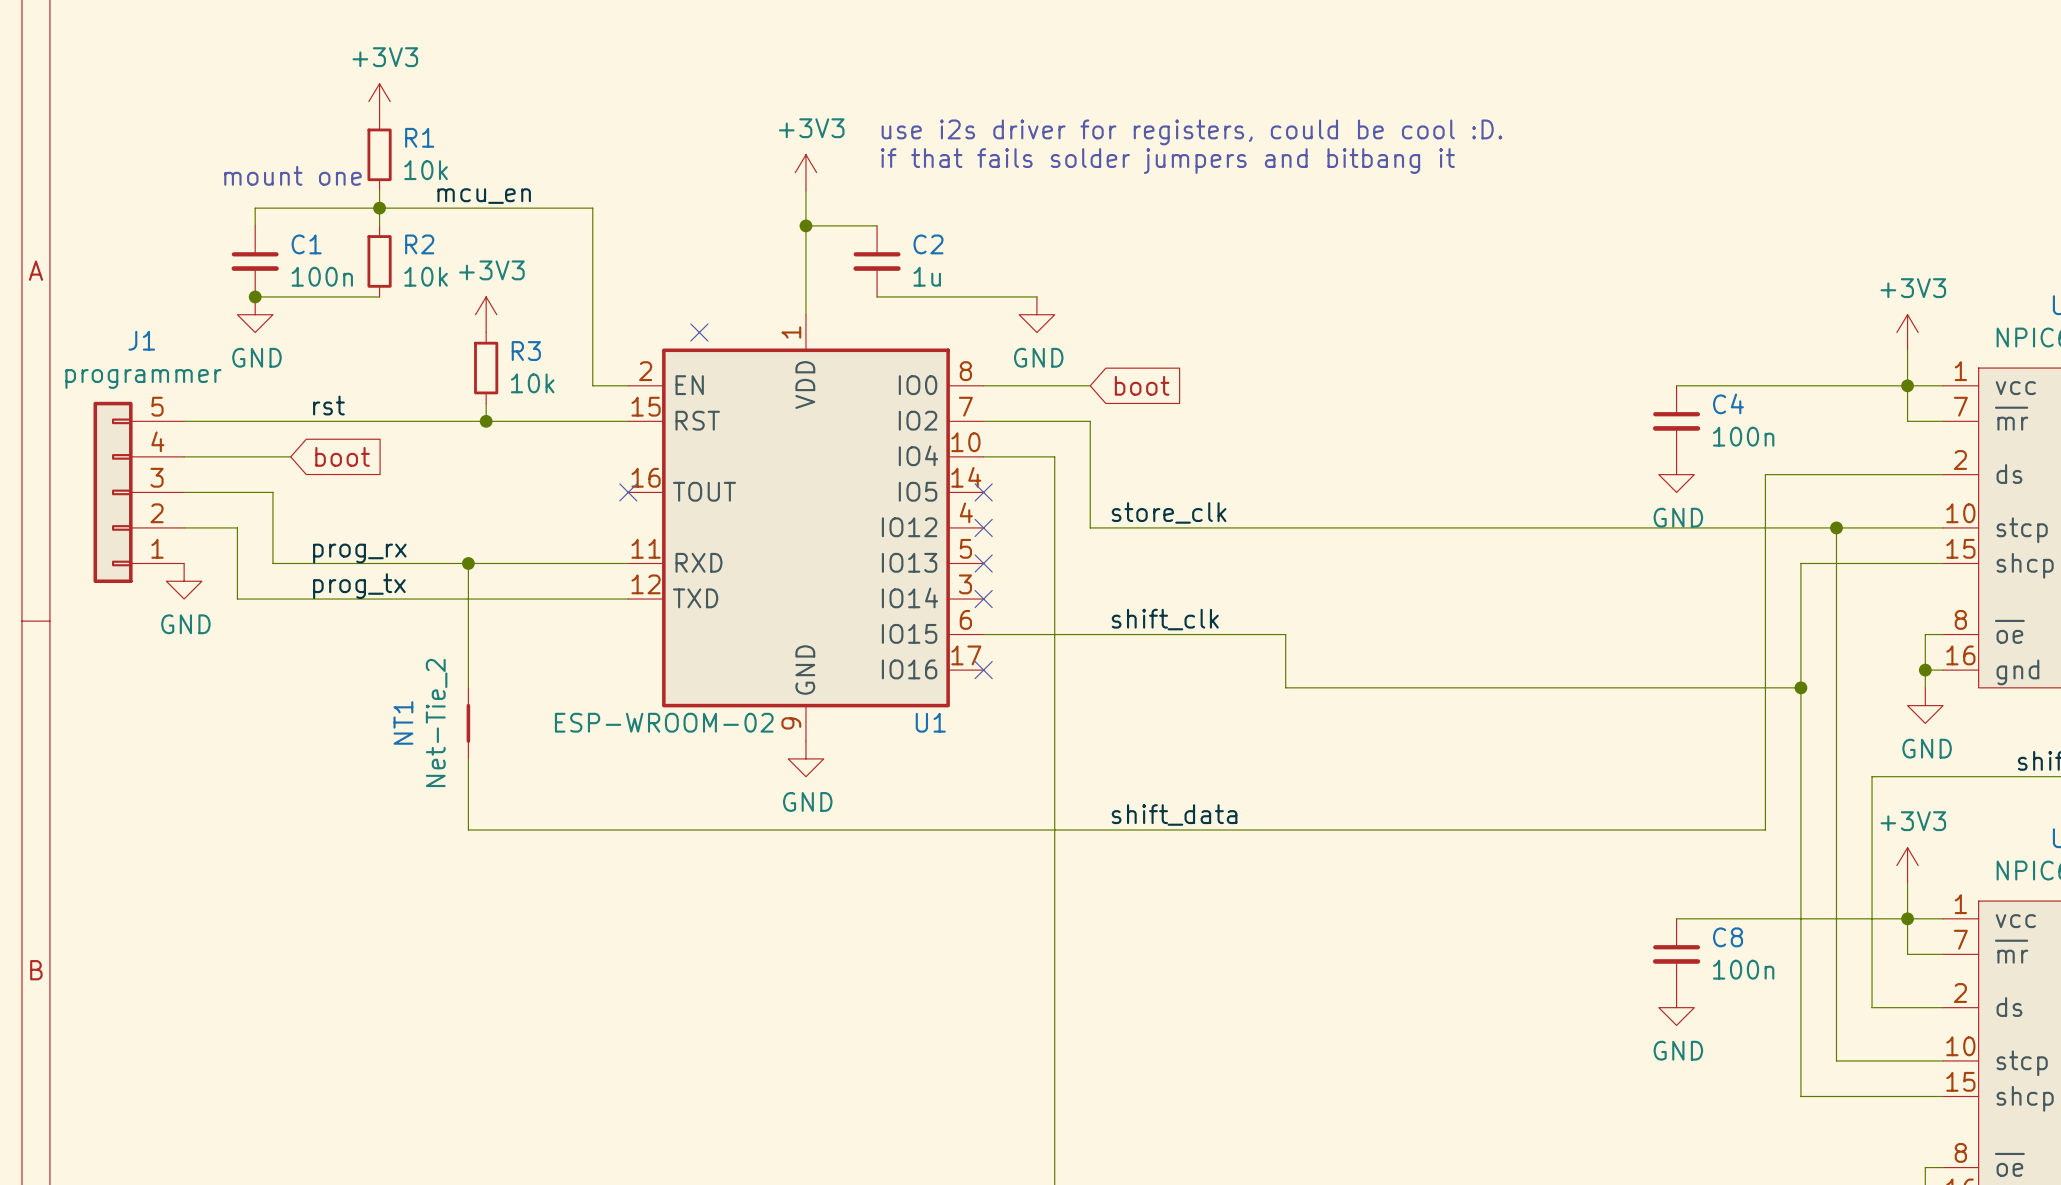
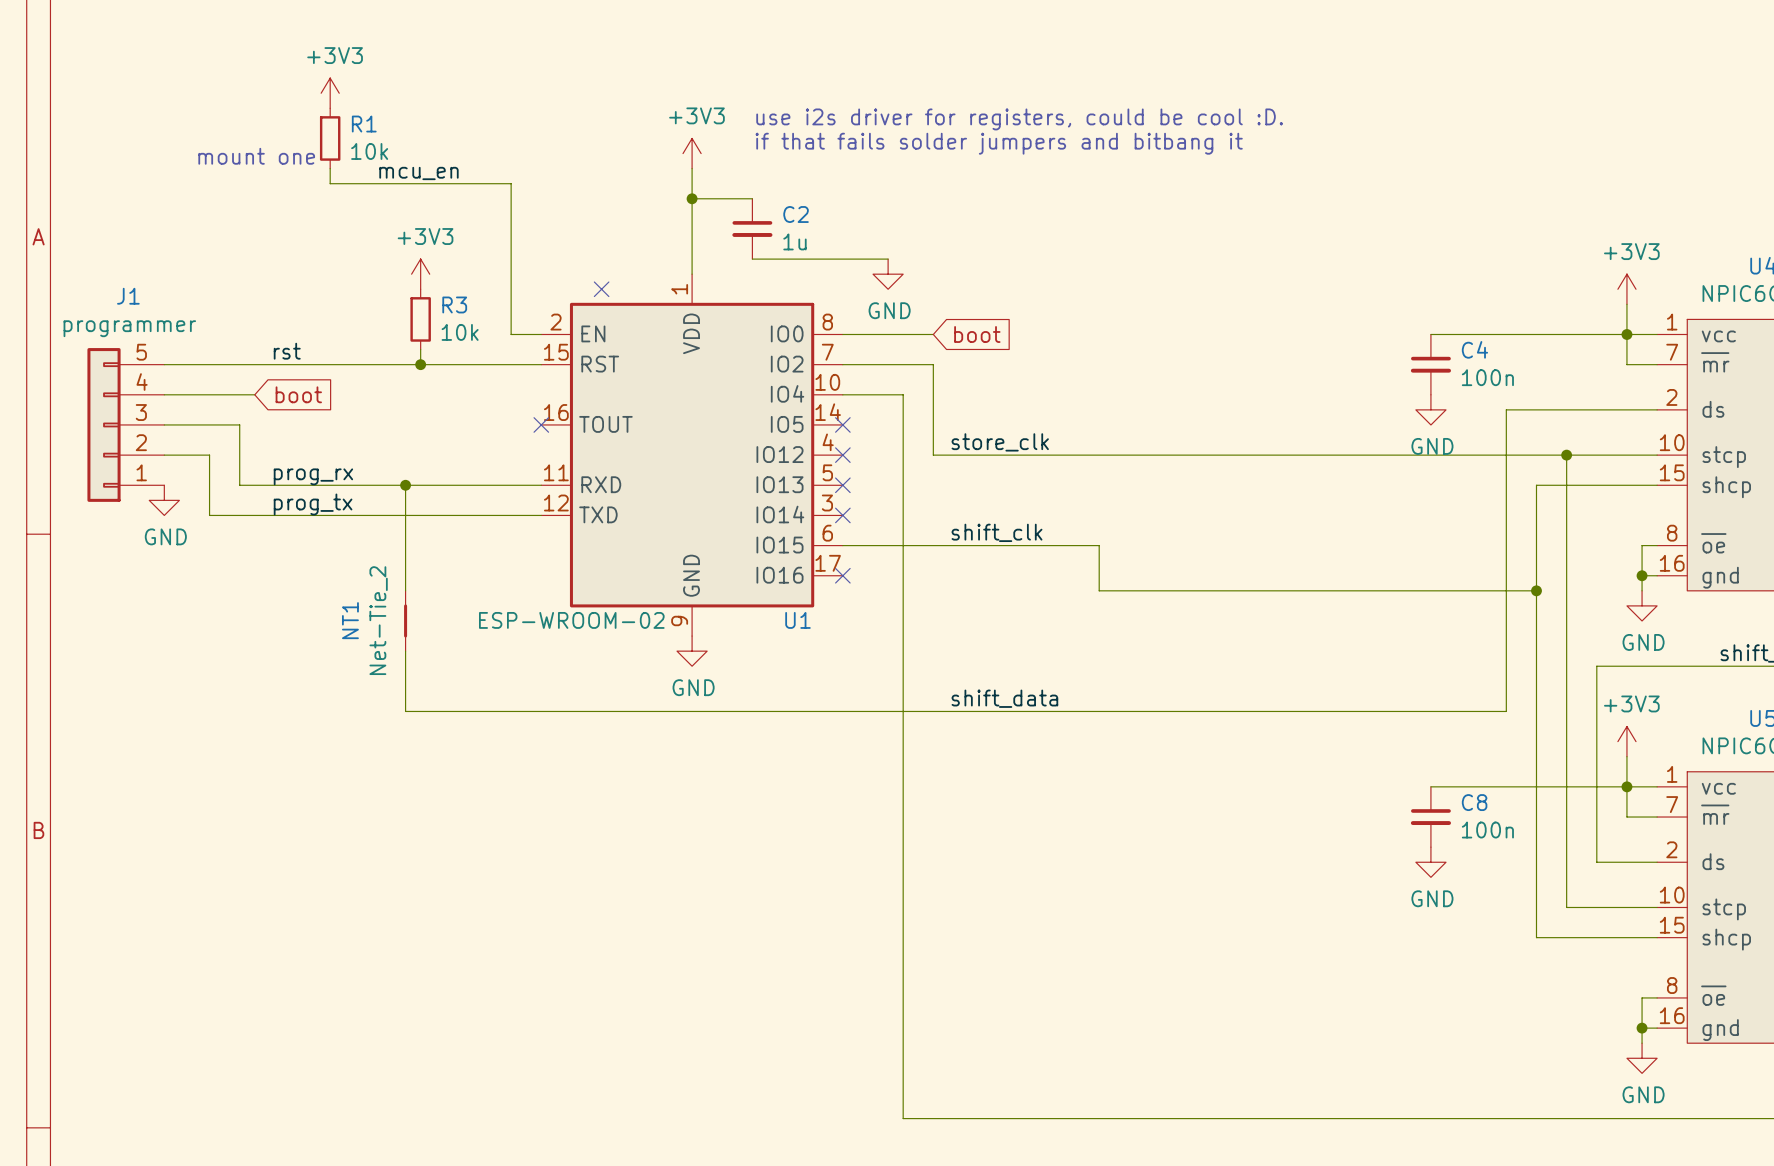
junction: (379, 208) -> none
wire: (255, 225) (255, 208) (379, 208) (379, 225) -> none
C1: 100n (255, 261) -> none
R2: 10k (379, 261) -> none
wire: (255, 296) (379, 296) -> none
junction: (255, 296) -> none
power symbol: GND (255, 314) -> none

